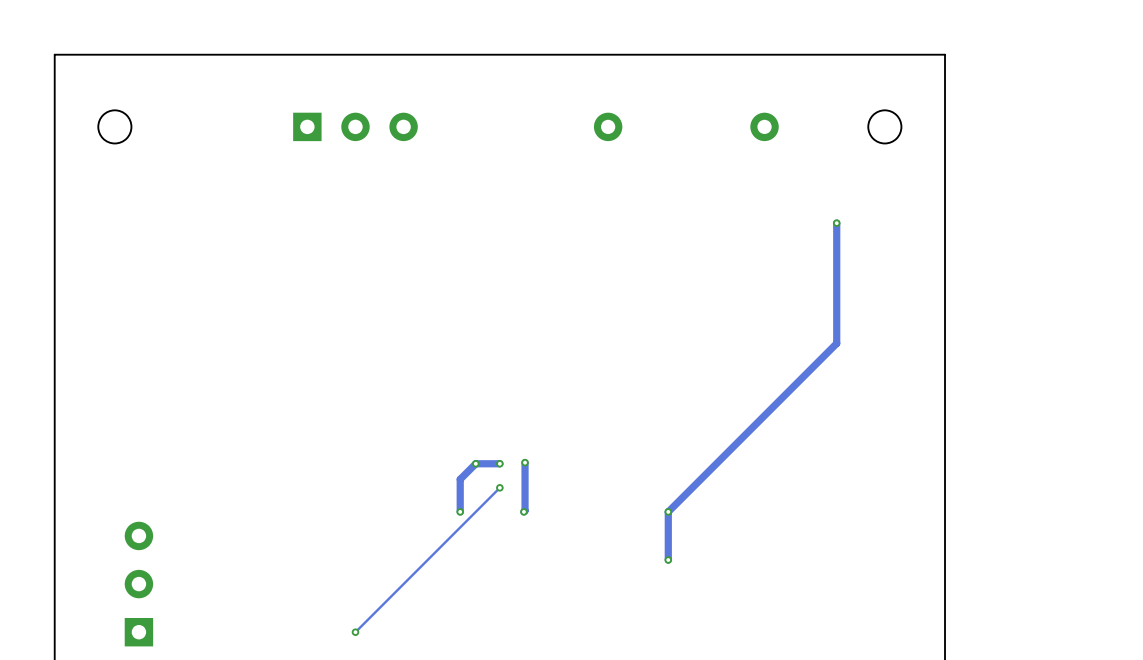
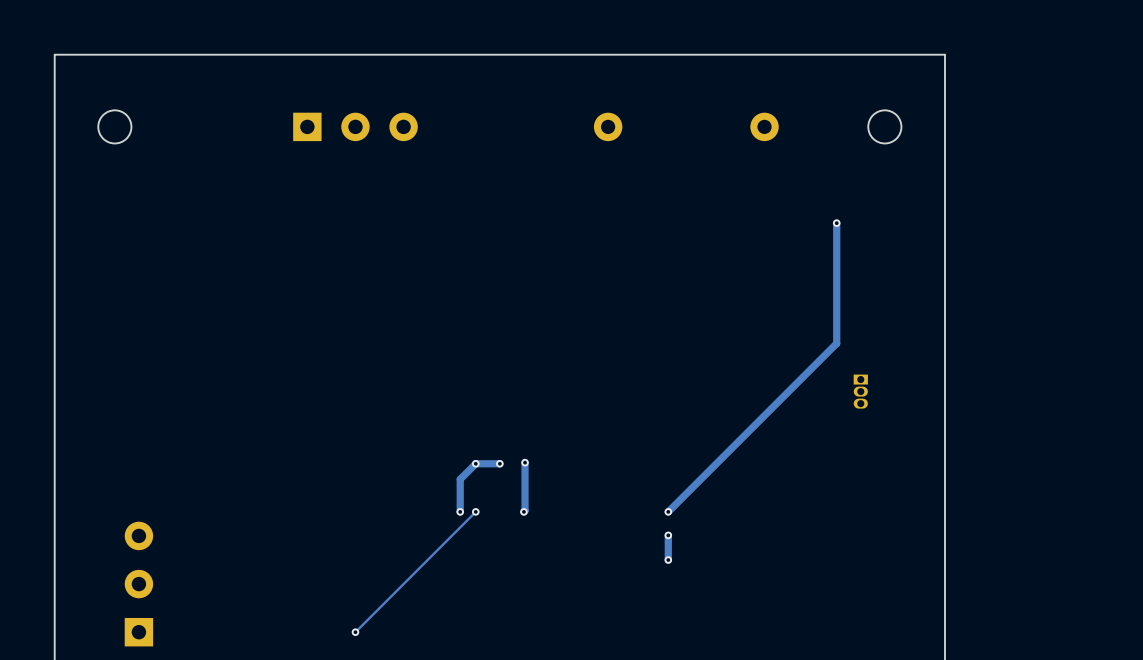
part: none -> (860, 391)
track: (499, 487) (475, 511) -> none
via position: (499, 487) -> (475, 511)
track: (668, 511) (668, 535) -> none
via: none -> (668, 535)

